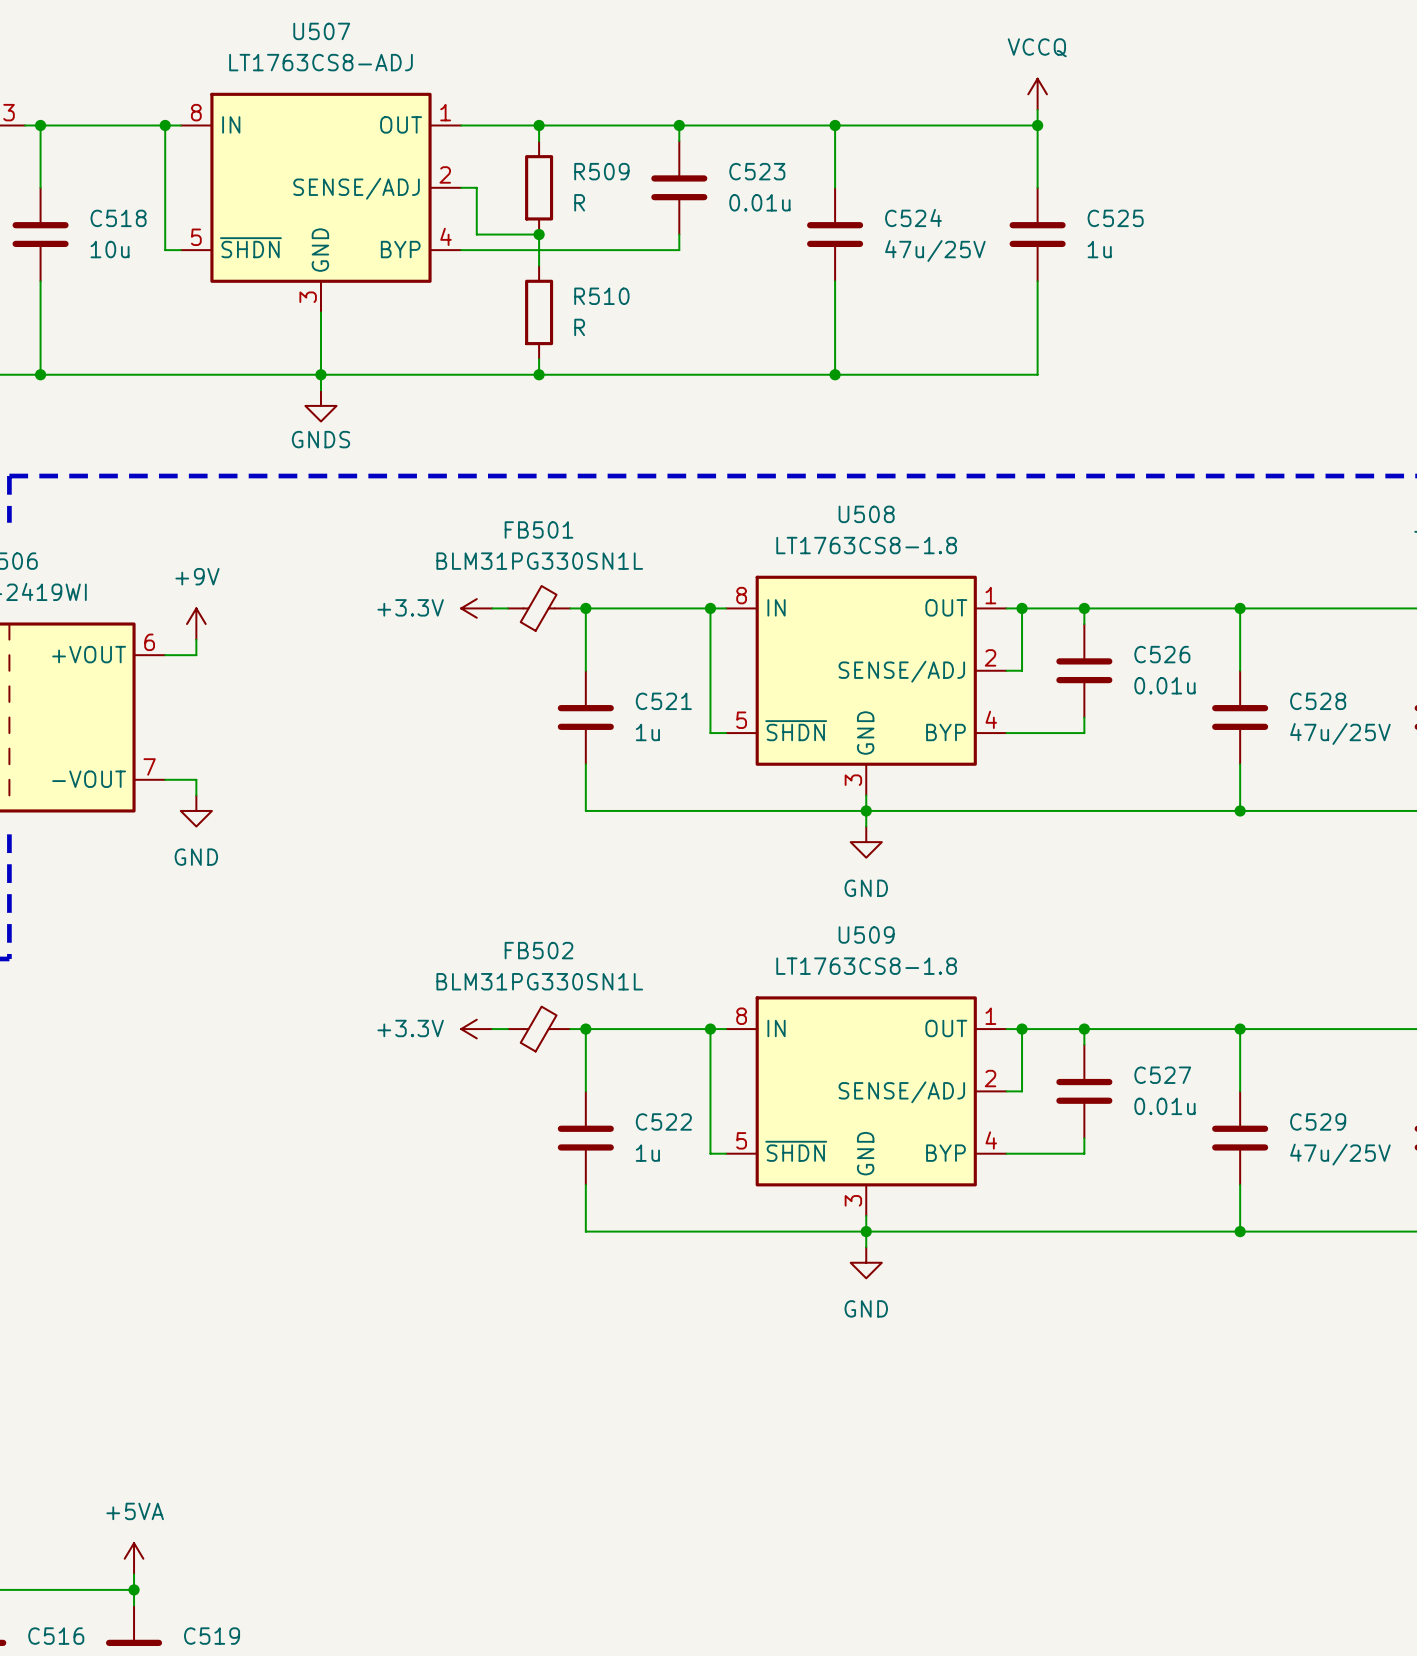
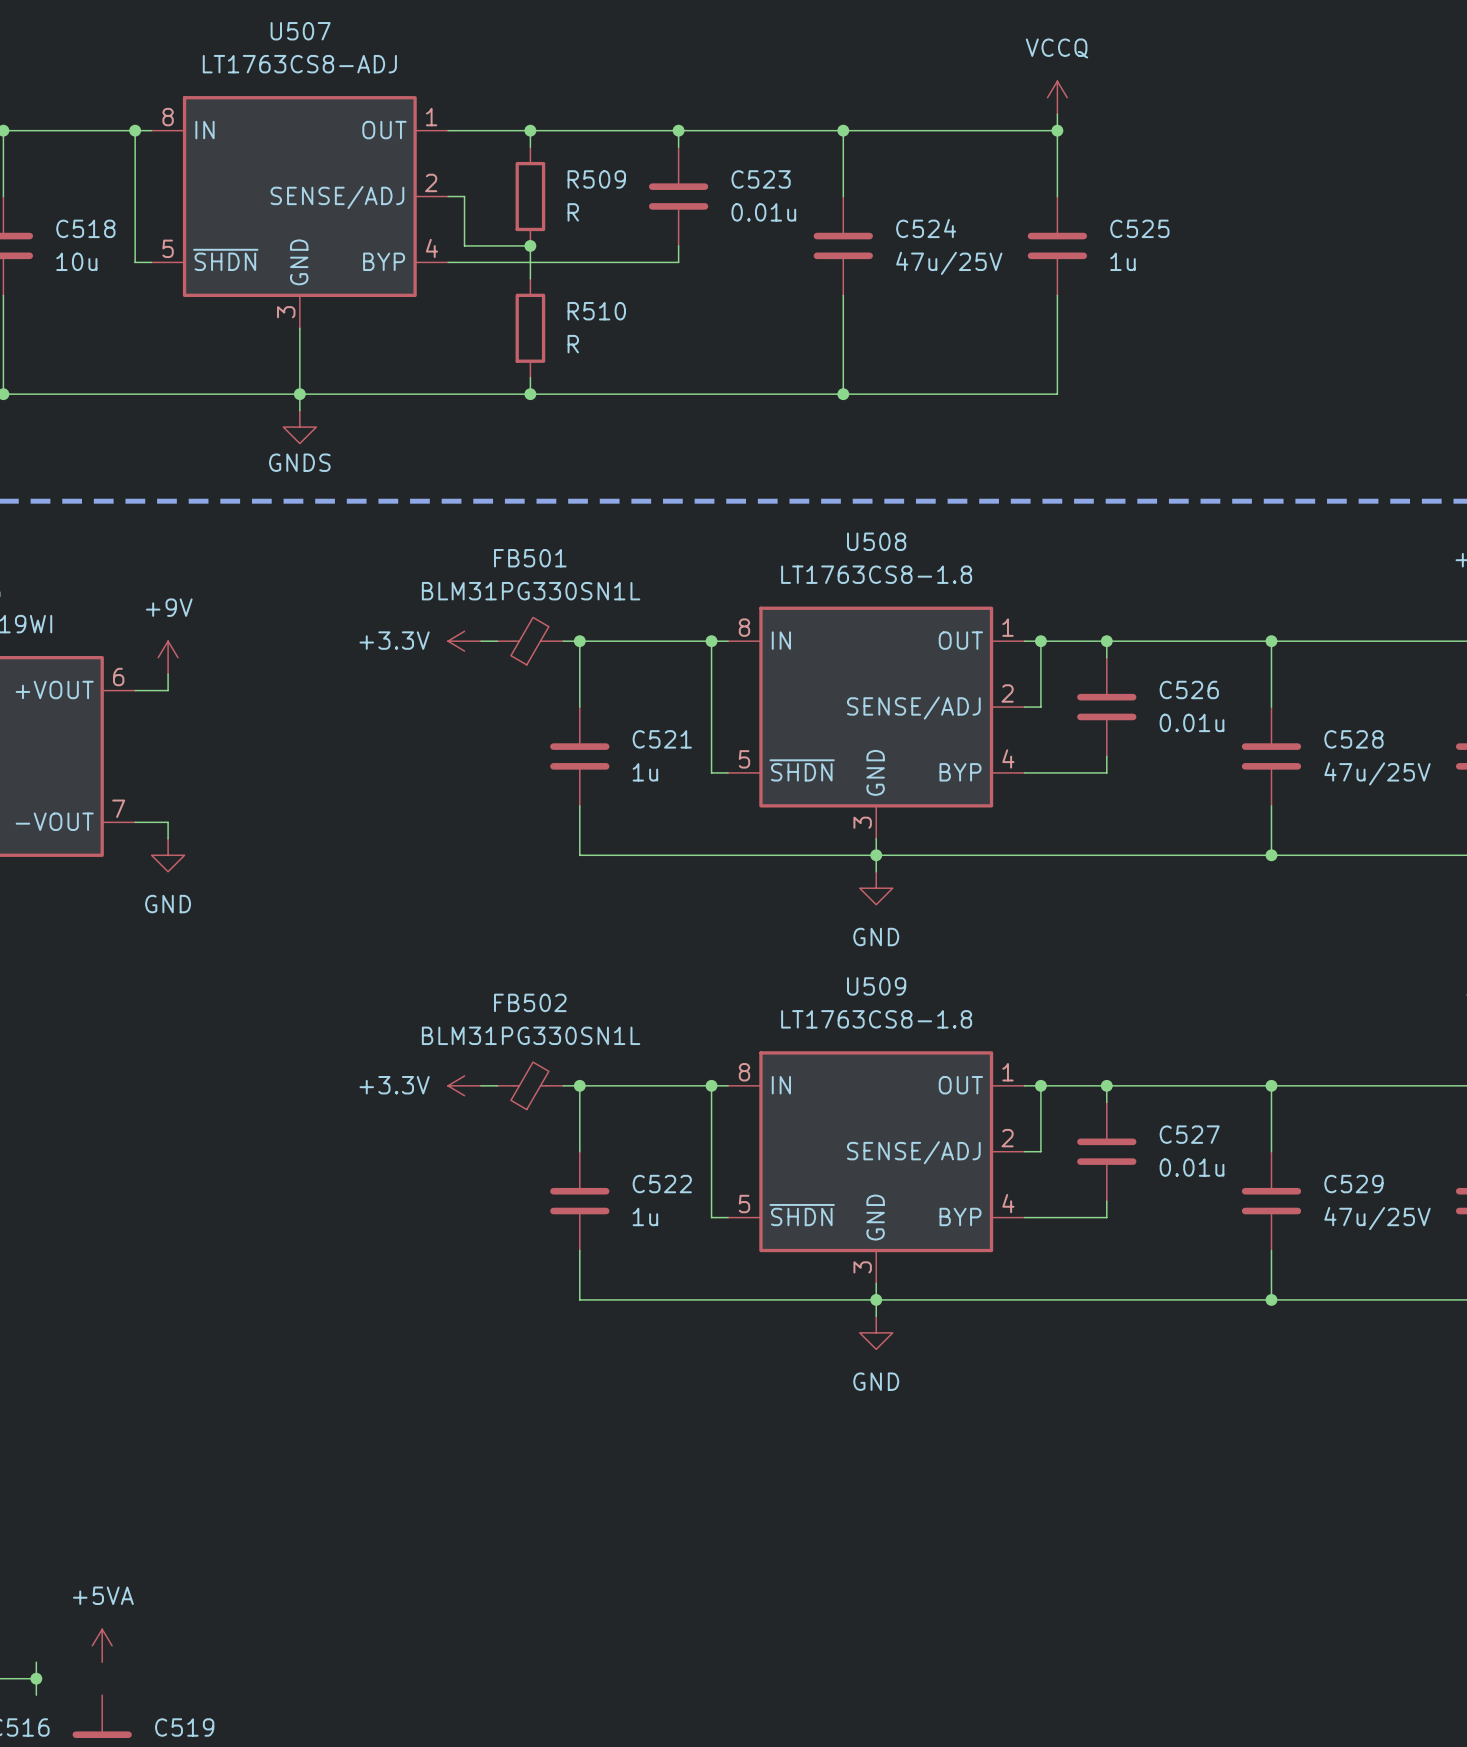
wire: (134, 1574) (134, 1605) -> (36, 1662) (36, 1695)
wire: (71, 1589) (134, 1589) -> none
junction position: (134, 1589) -> (36, 1678)

